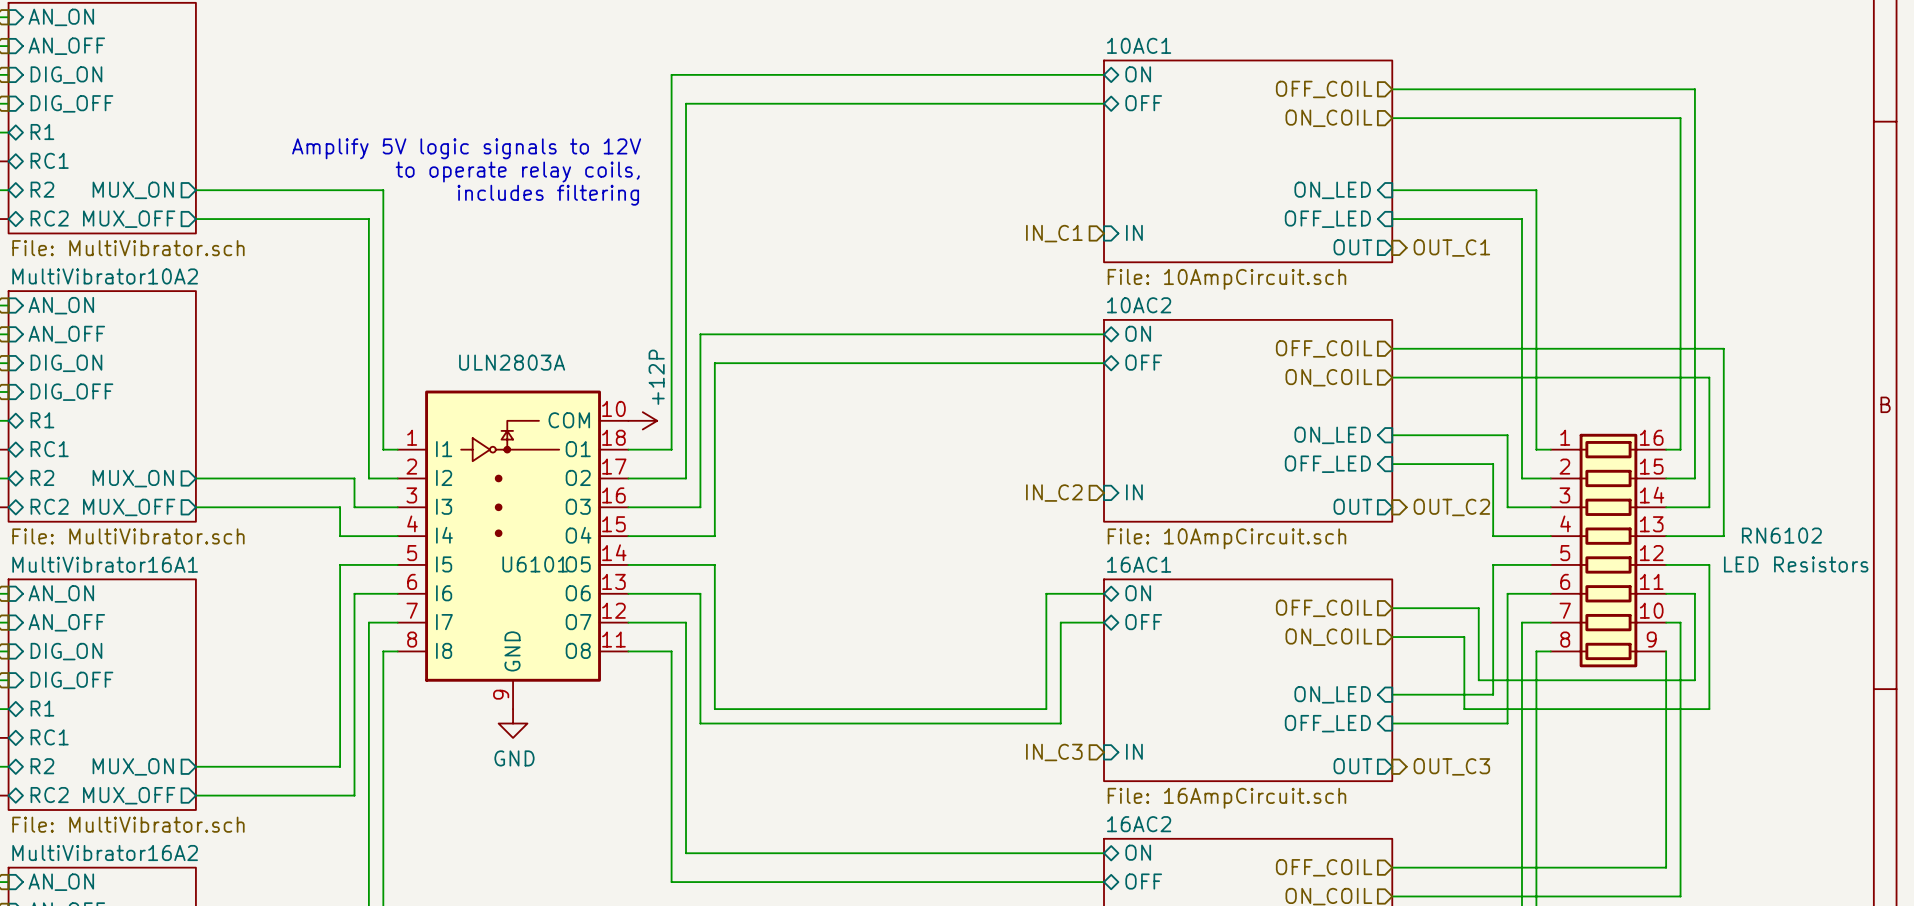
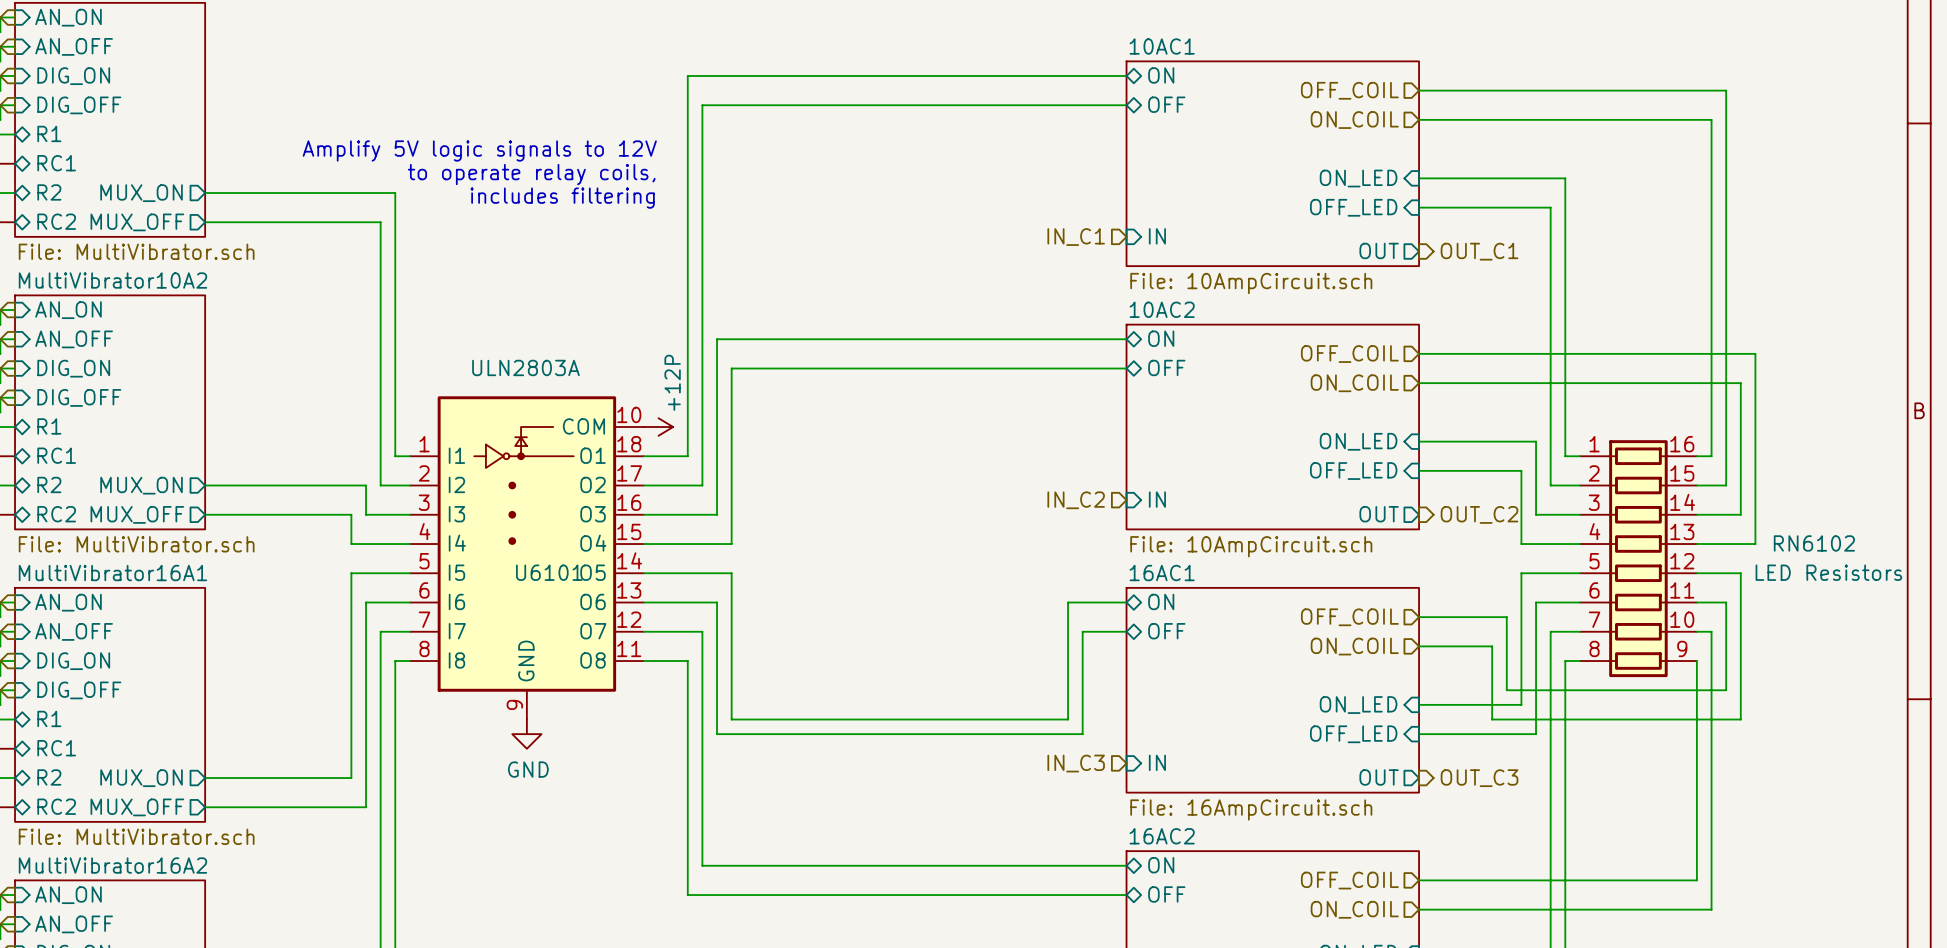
sheet pin position: ON_LED (1332, 190) -> ON_LED (1358, 178)
wire: (1392, 190) (1536, 190) -> (1419, 178) (1565, 178) (1565, 193)
sheet pin position: OFF_LED (1327, 219) -> OFF_LED (1353, 207)
wire: (1392, 219) (1521, 219) -> (1419, 207) (1550, 207) (1550, 222)

